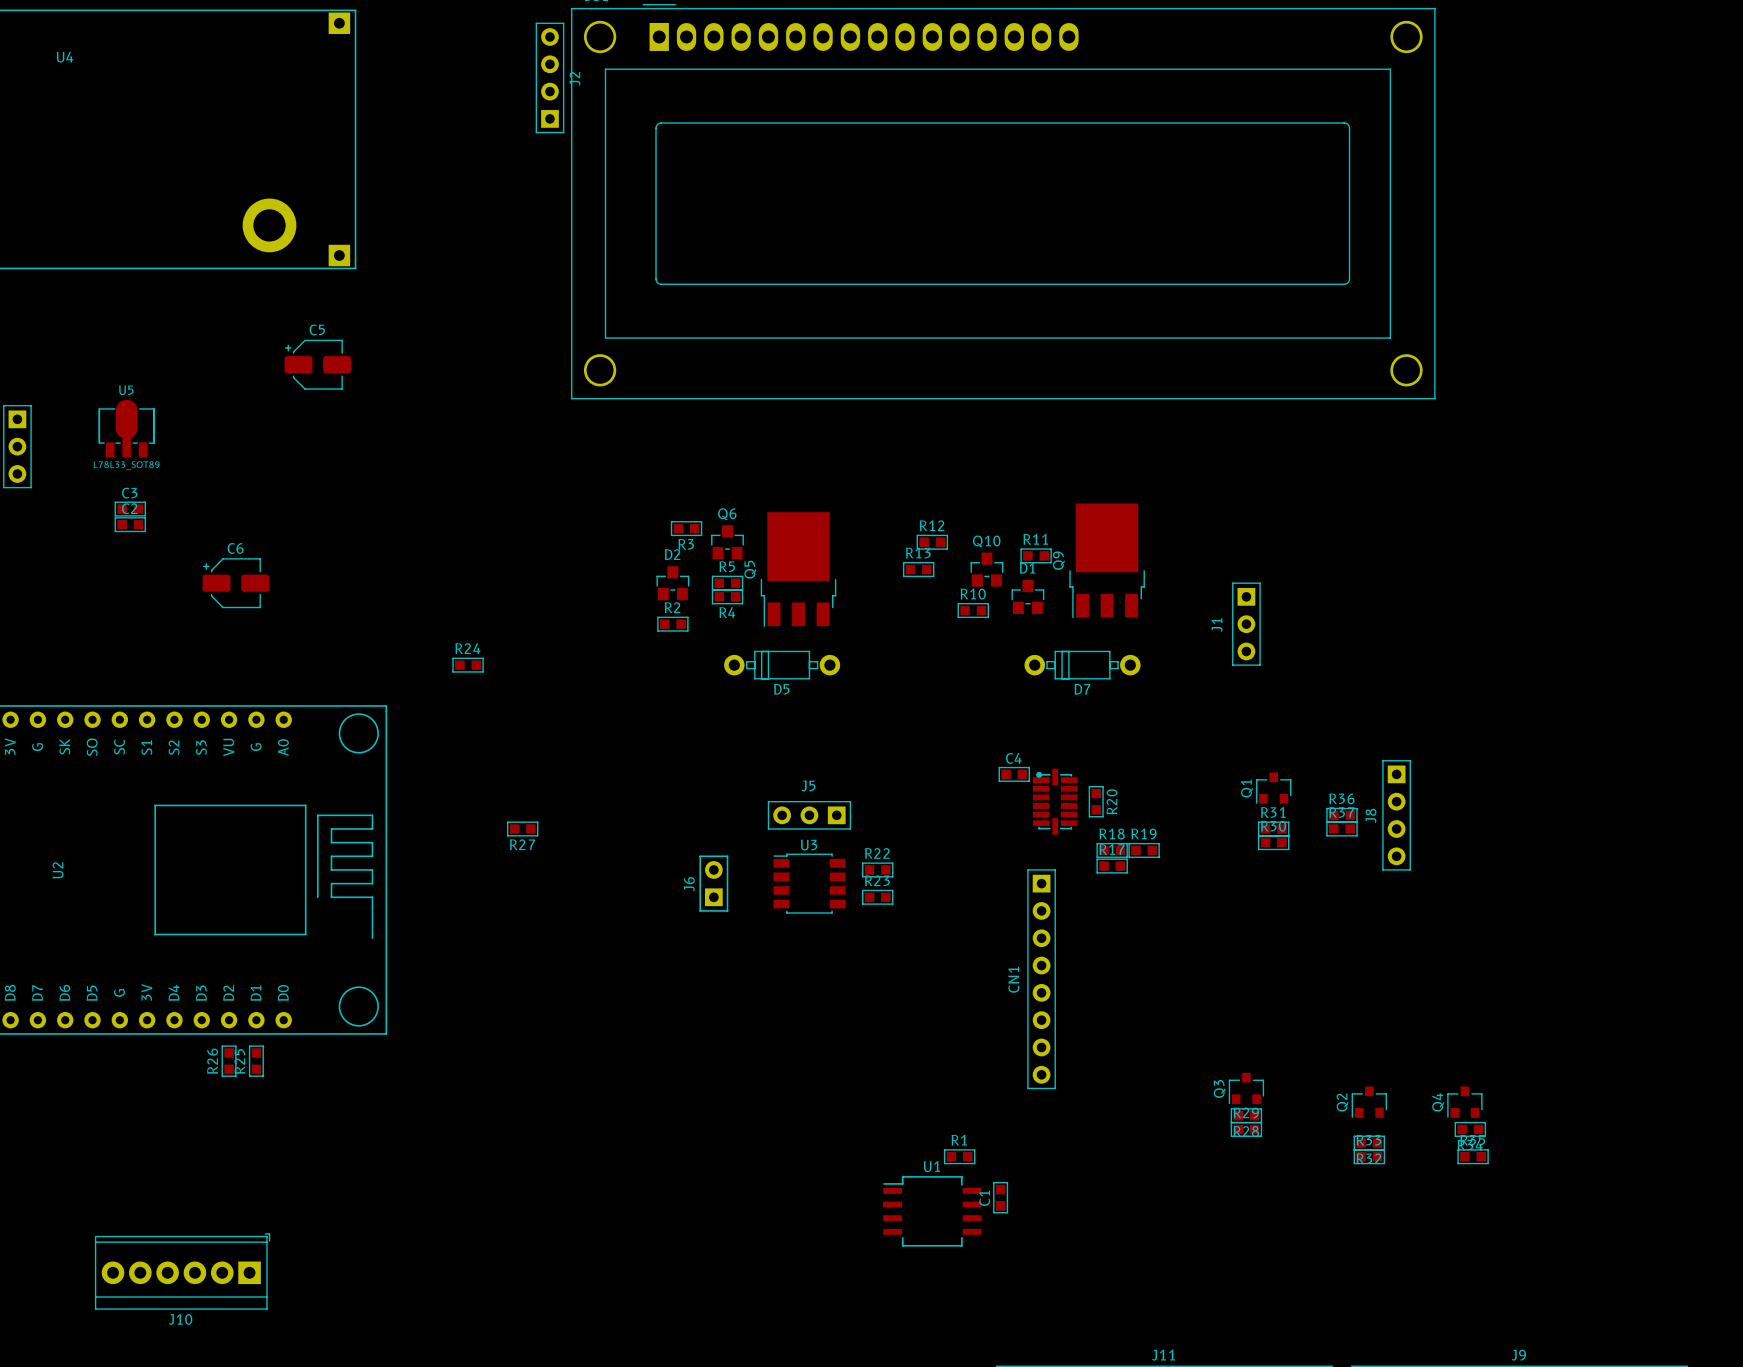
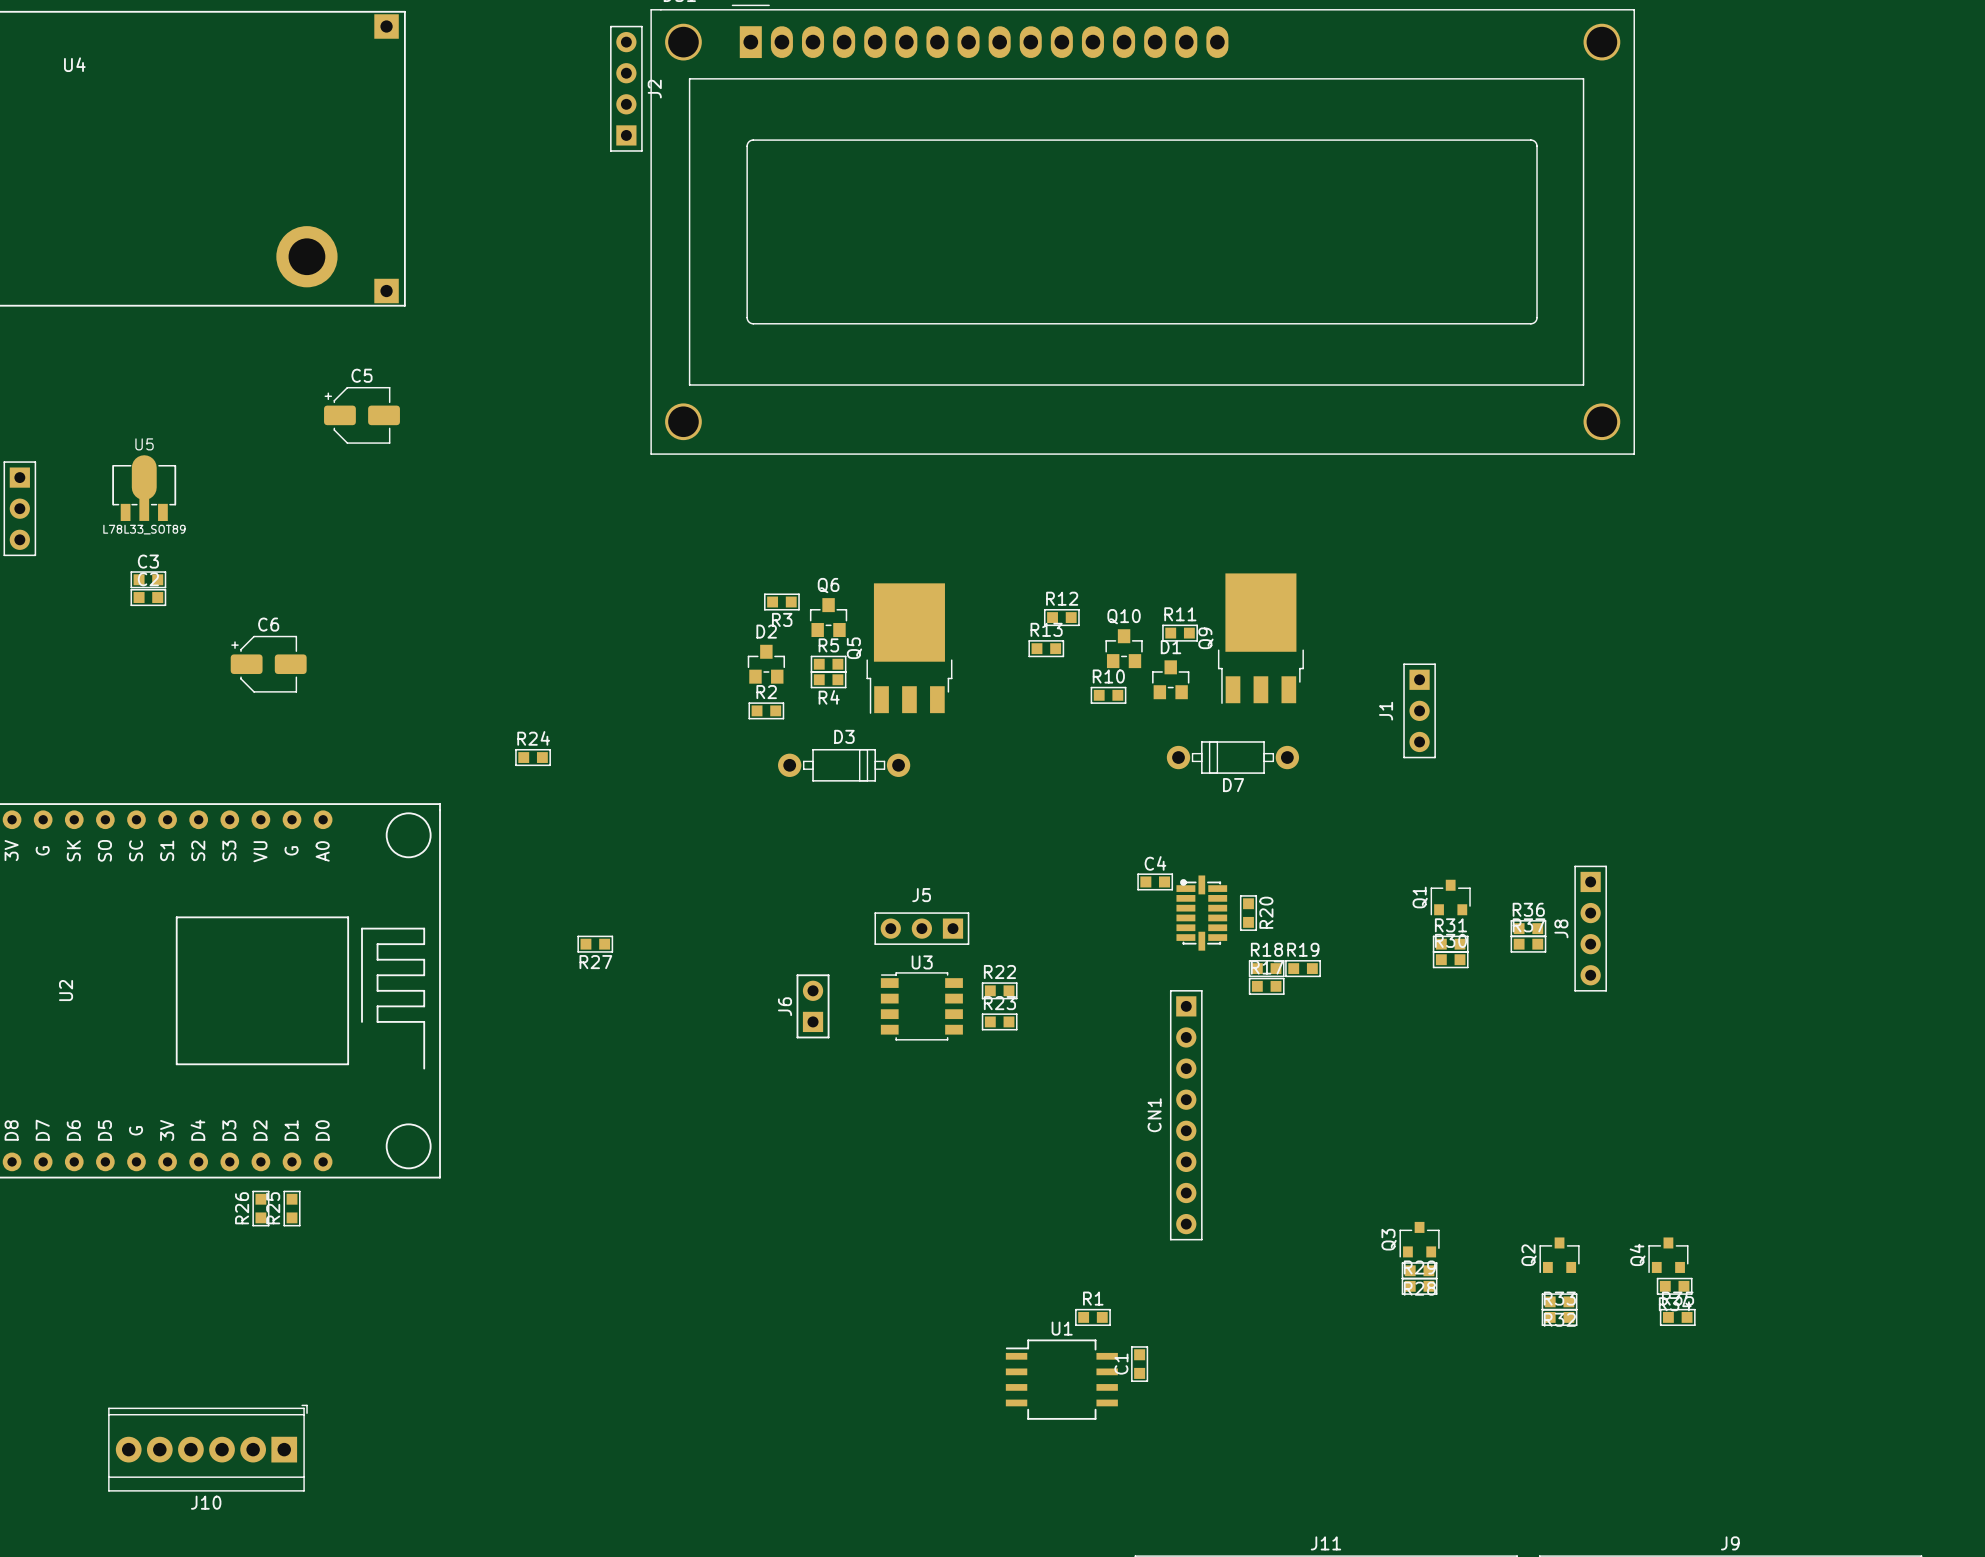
D5: (782, 665) -> none
D3: none -> (844, 765)

